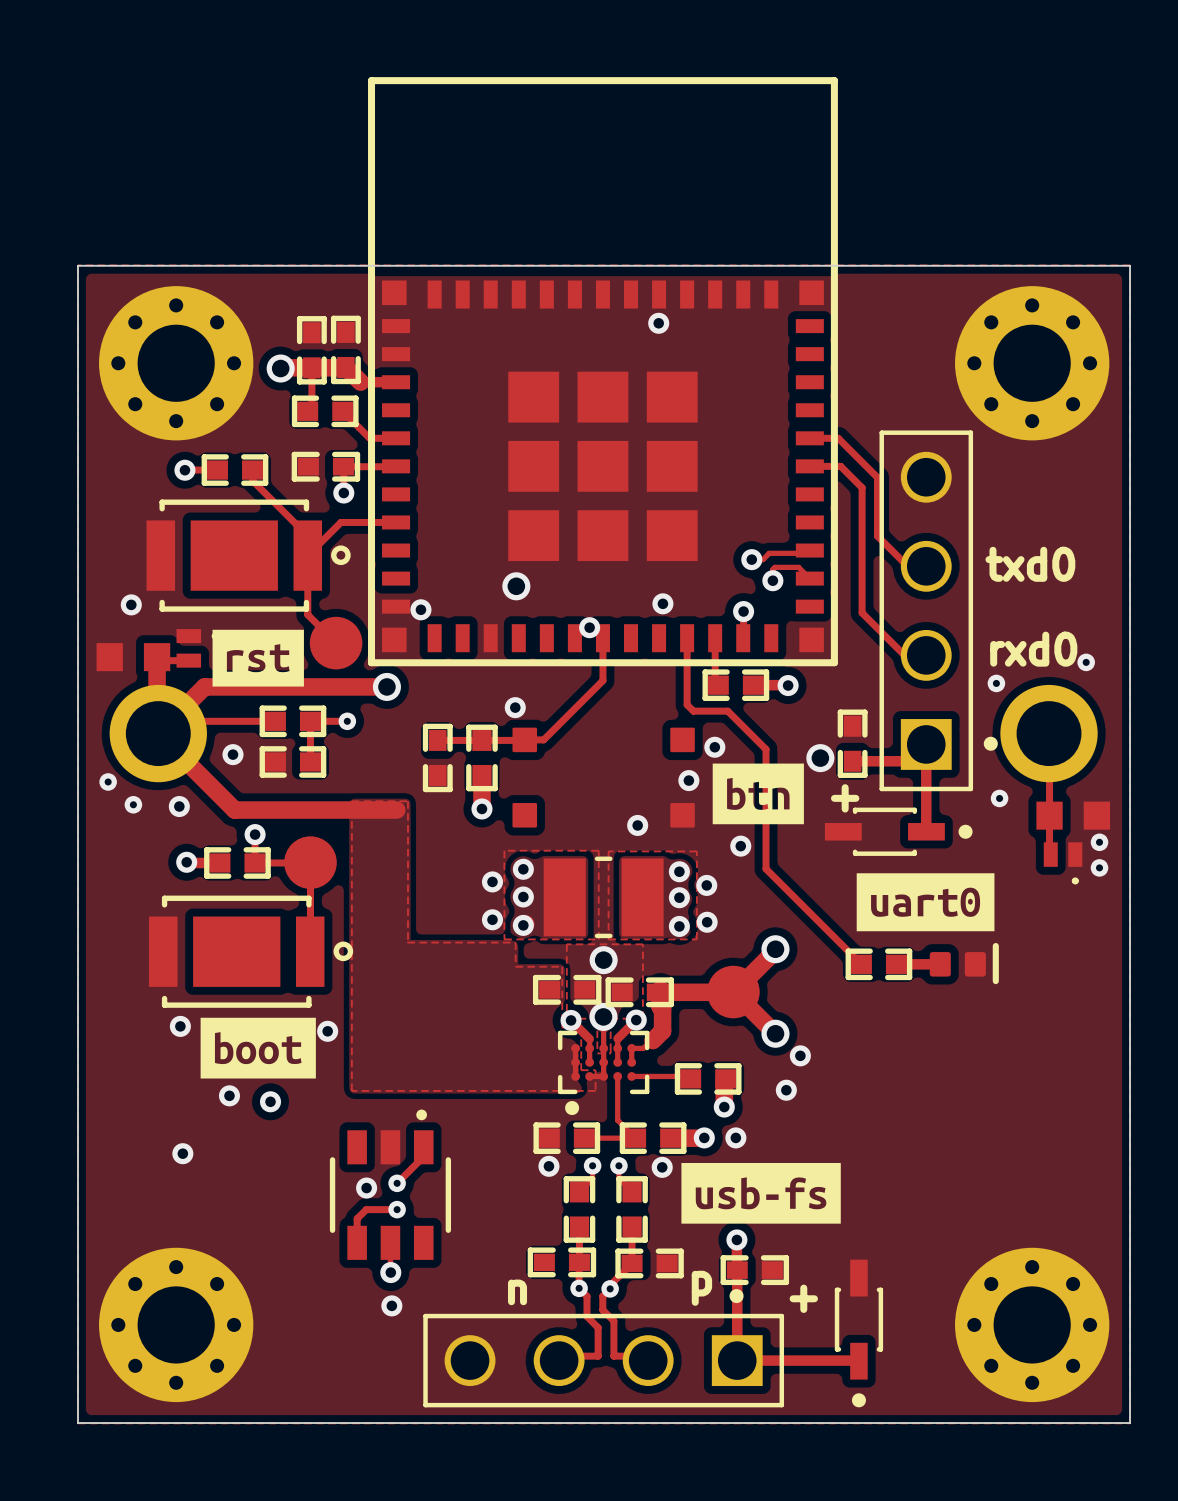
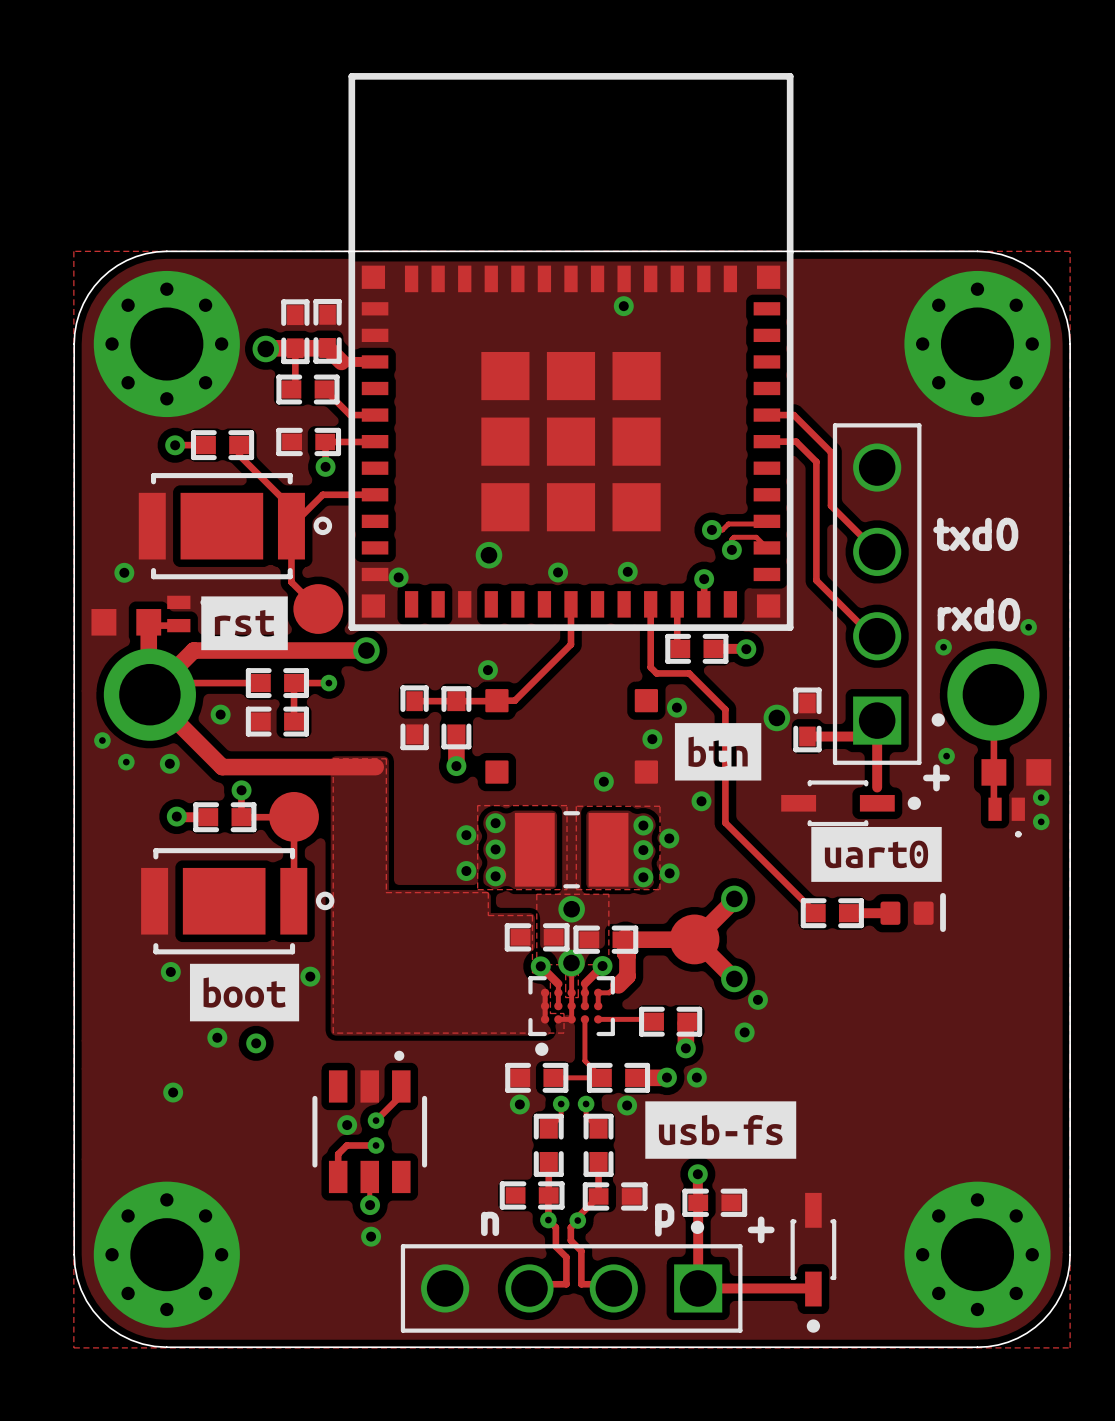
board edge: (1130, 363) (1130, 265) (77, 265) (77, 1423) (1130, 1423) (1130, 1325) -> (1070, 344) (1066, 320) (1063, 308) (1050, 287) (1042, 278) (1033, 270) (1012, 258) (989, 252) (166, 251) (136, 256) (117, 265) (101, 278) (88, 294) (79, 313) (74, 344) (74, 1254) (77, 1278) (81, 1290) (93, 1311) (101, 1320) (120, 1334) (131, 1340) (142, 1344) (166, 1347) (987, 1346) (1017, 1338) (1035, 1327) (1049, 1312) (1064, 1285) (1070, 1254)
track: (877, 534) (907, 566) (926, 566) -> (831, 505) (877, 551)
part position: (938, 610) -> (888, 594)
via position: (589, 627) -> (558, 572)
part position: (852, 743) -> (807, 719)
track: (852, 761) (909, 761) -> (807, 736) (861, 736)
text position: + (845, 798) -> + (936, 777)
part position: (898, 831) -> (851, 803)

